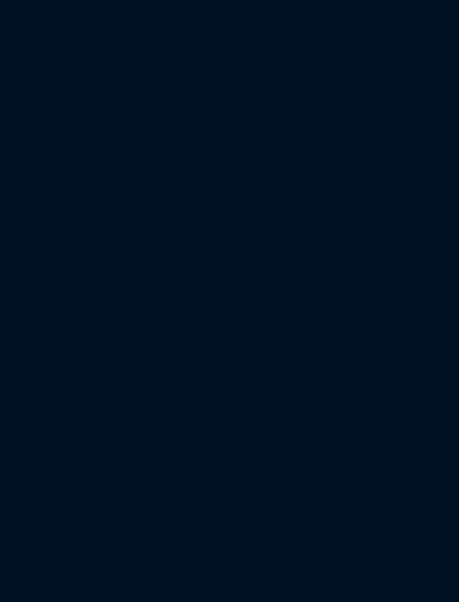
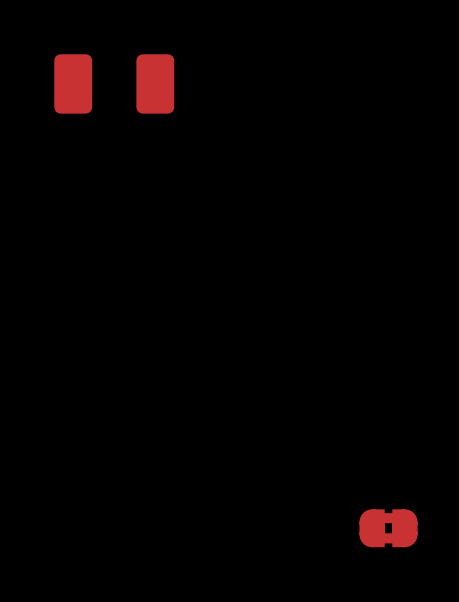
part: none -> (114, 83)
part: none -> (388, 528)

